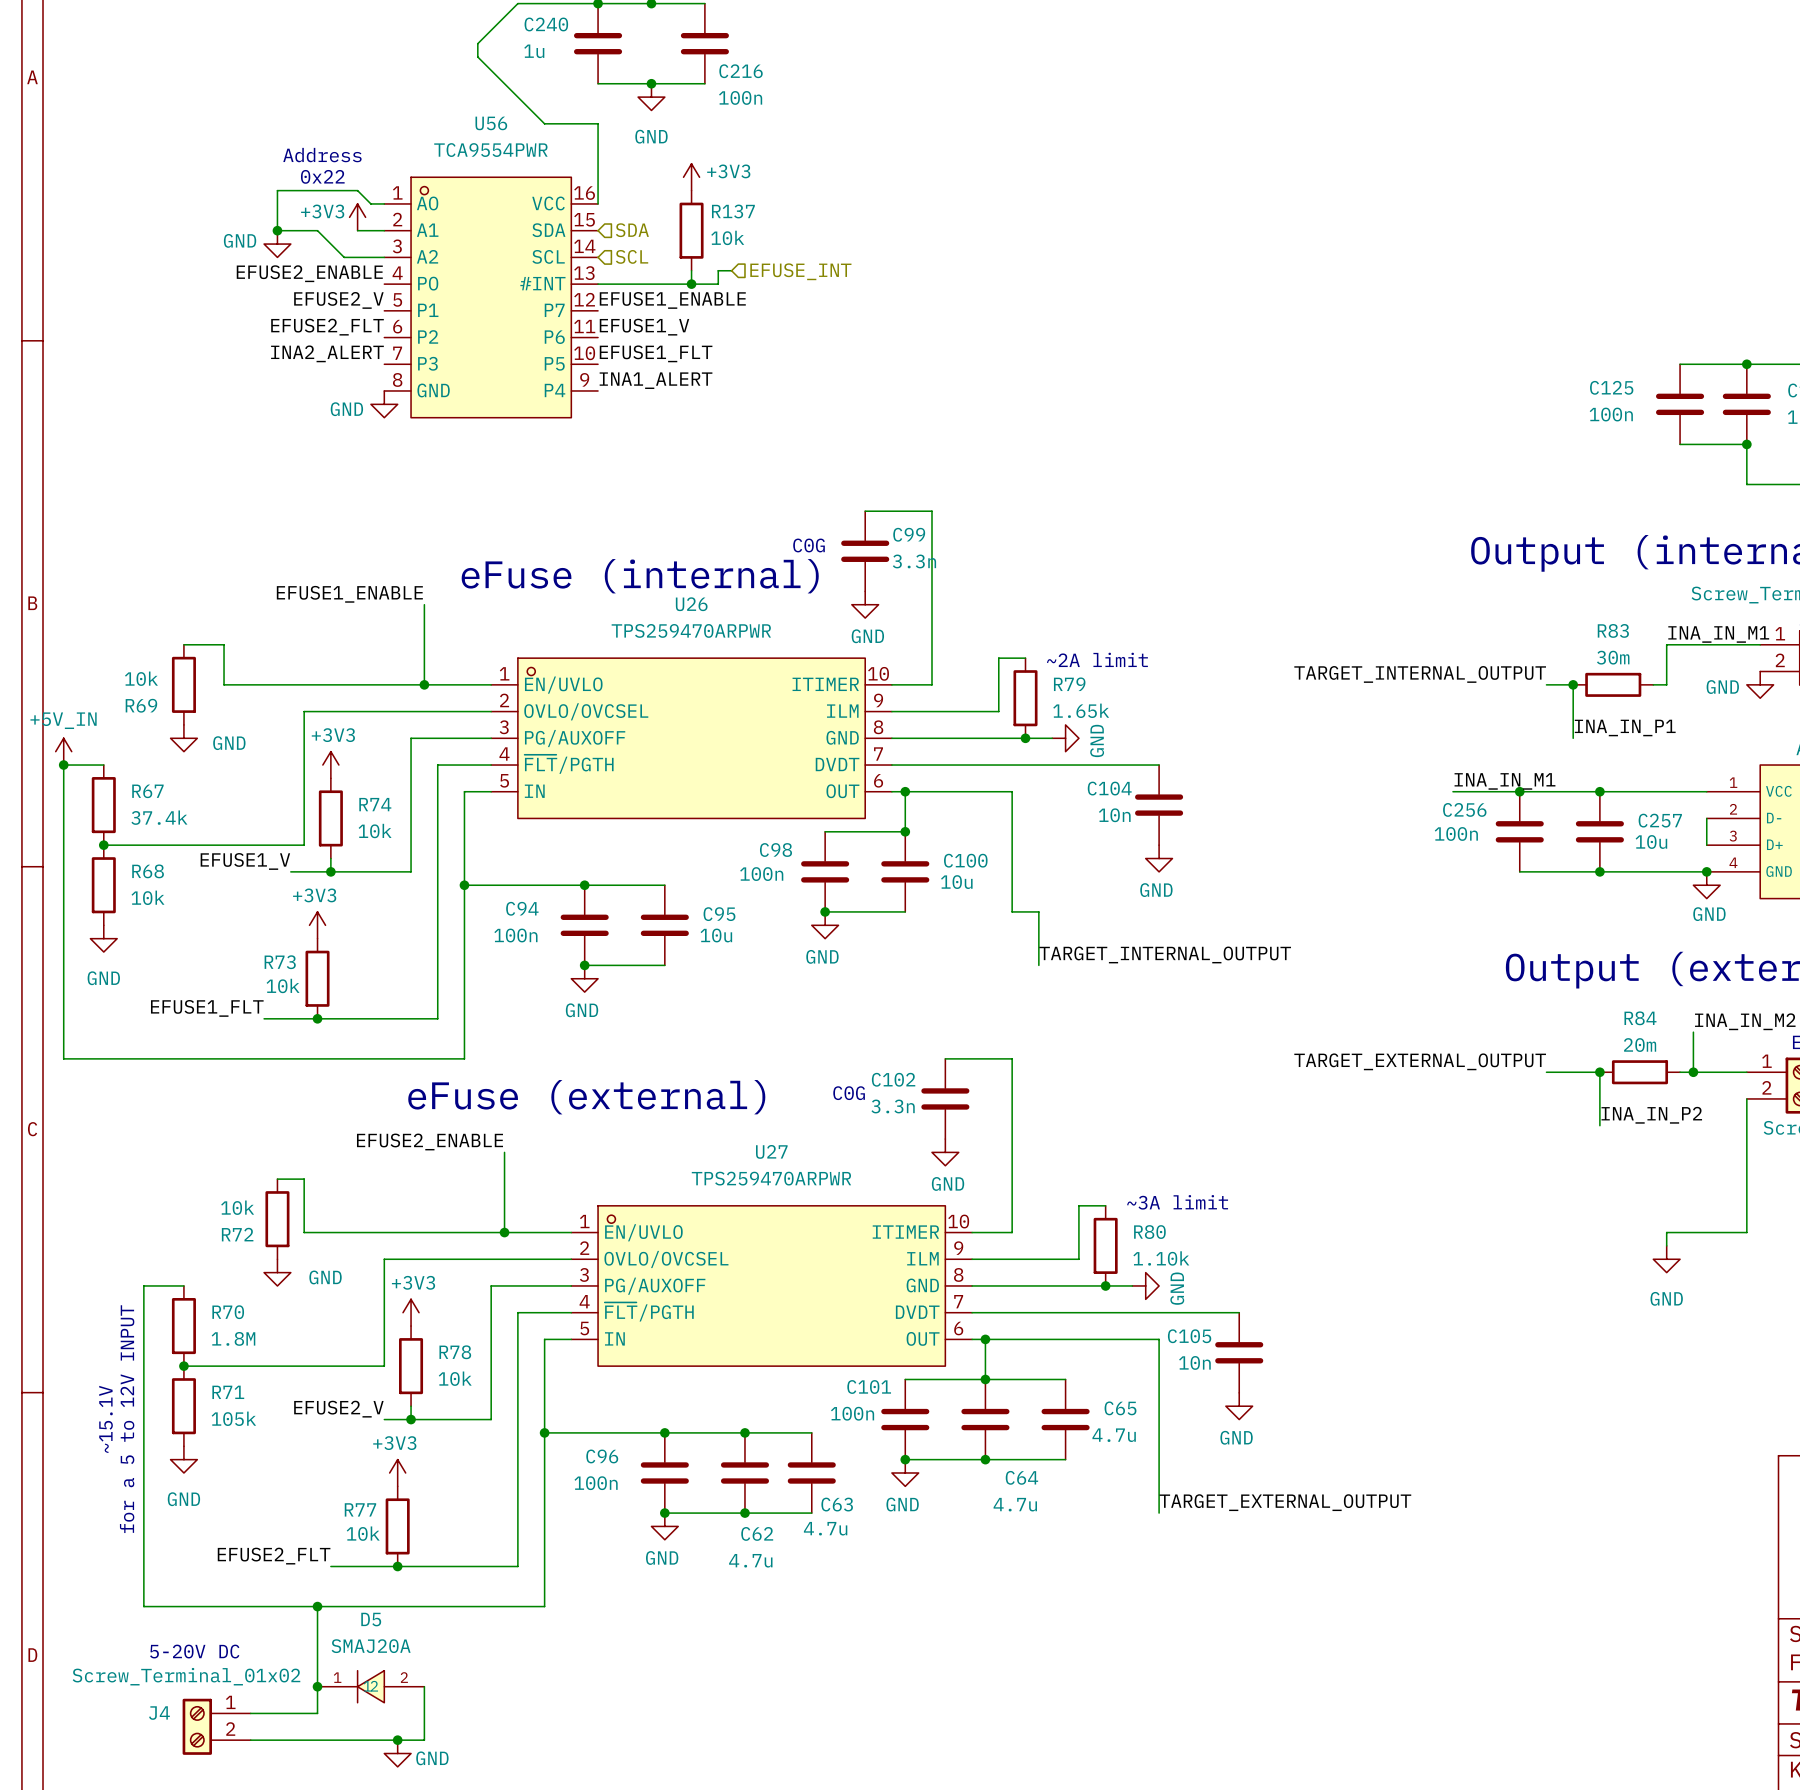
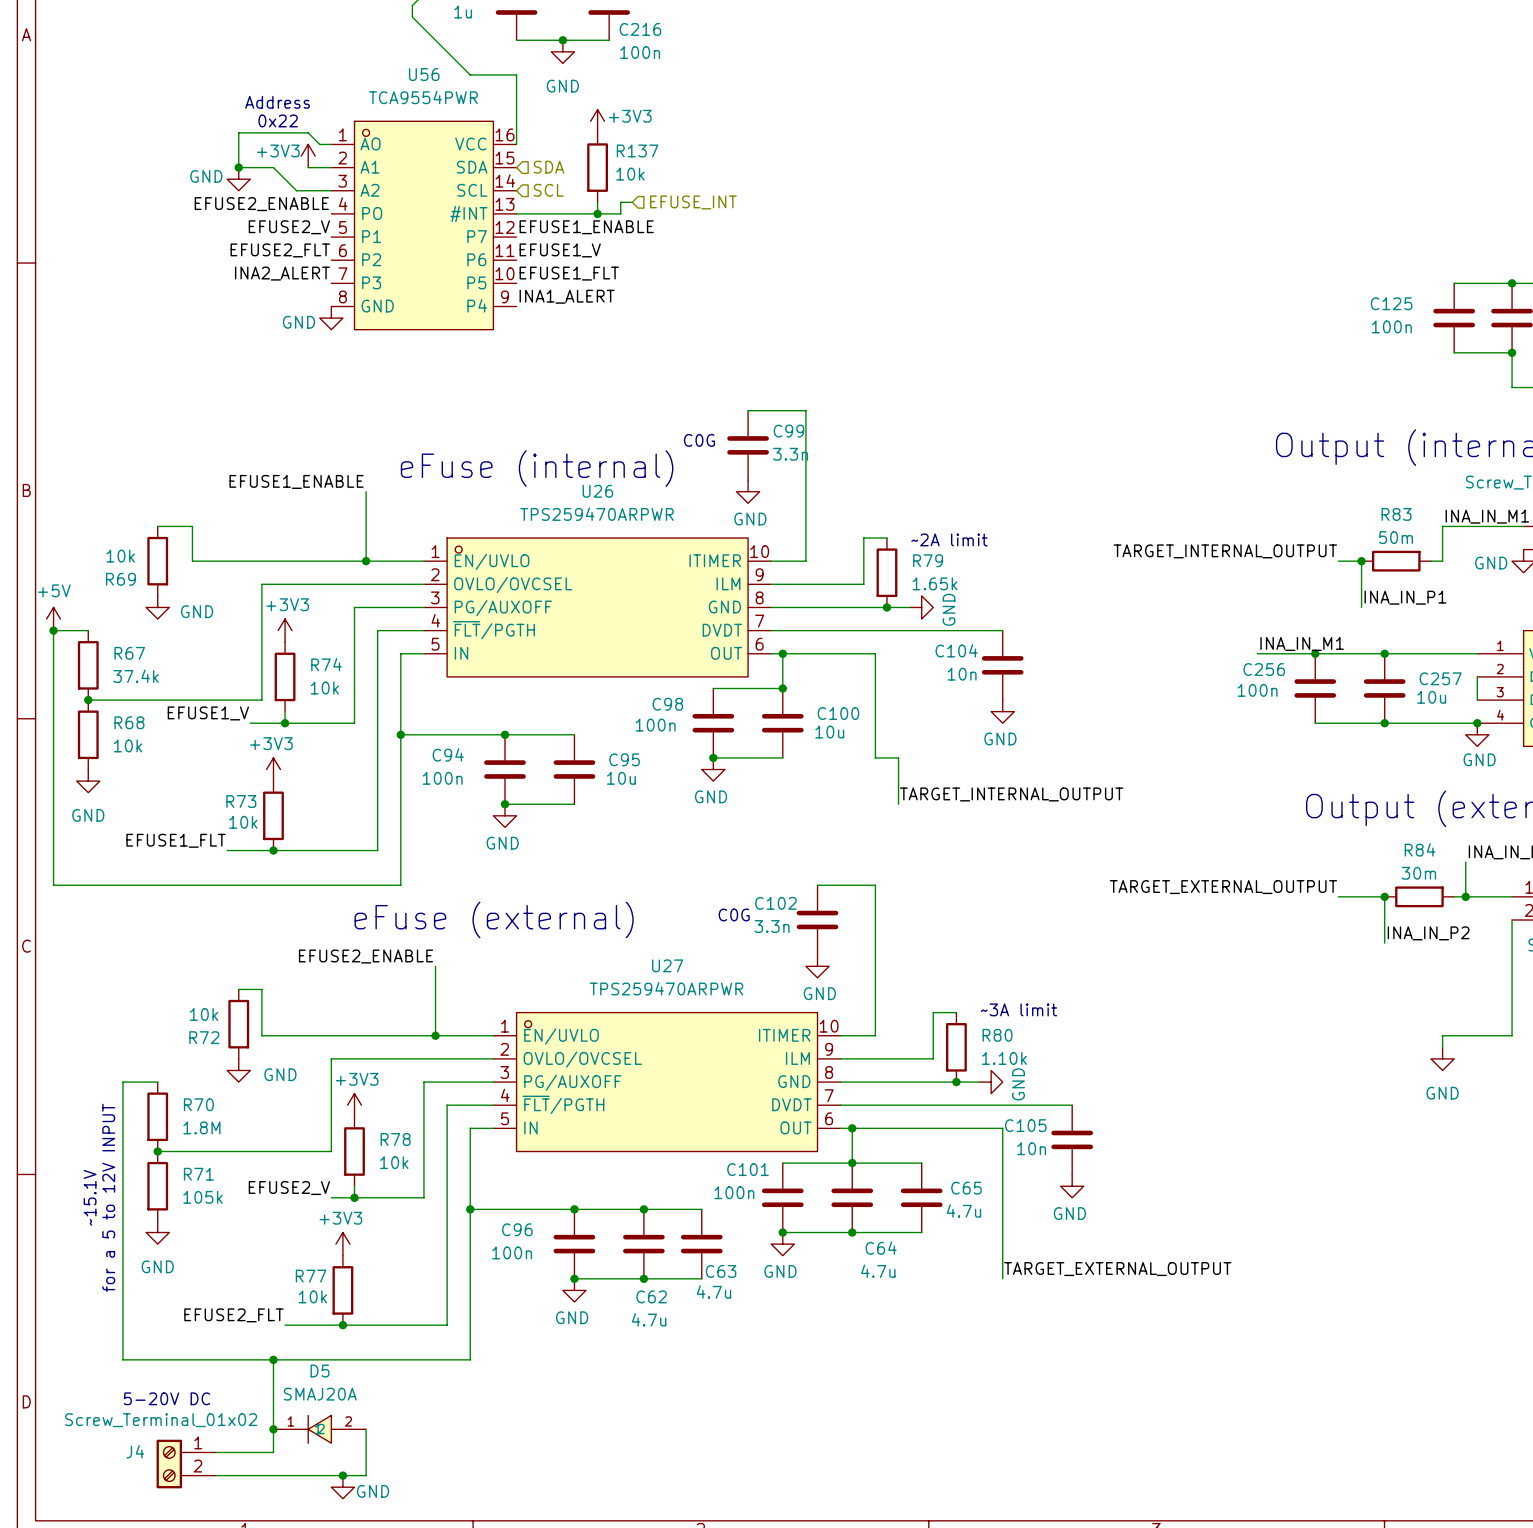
R83 value: 30m (1613, 657) -> 50m (1396, 537)
power symbol: +5V_IN (63, 751) -> +5V (53, 619)
R84 value: 20m (1640, 1045) -> 30m (1418, 873)

